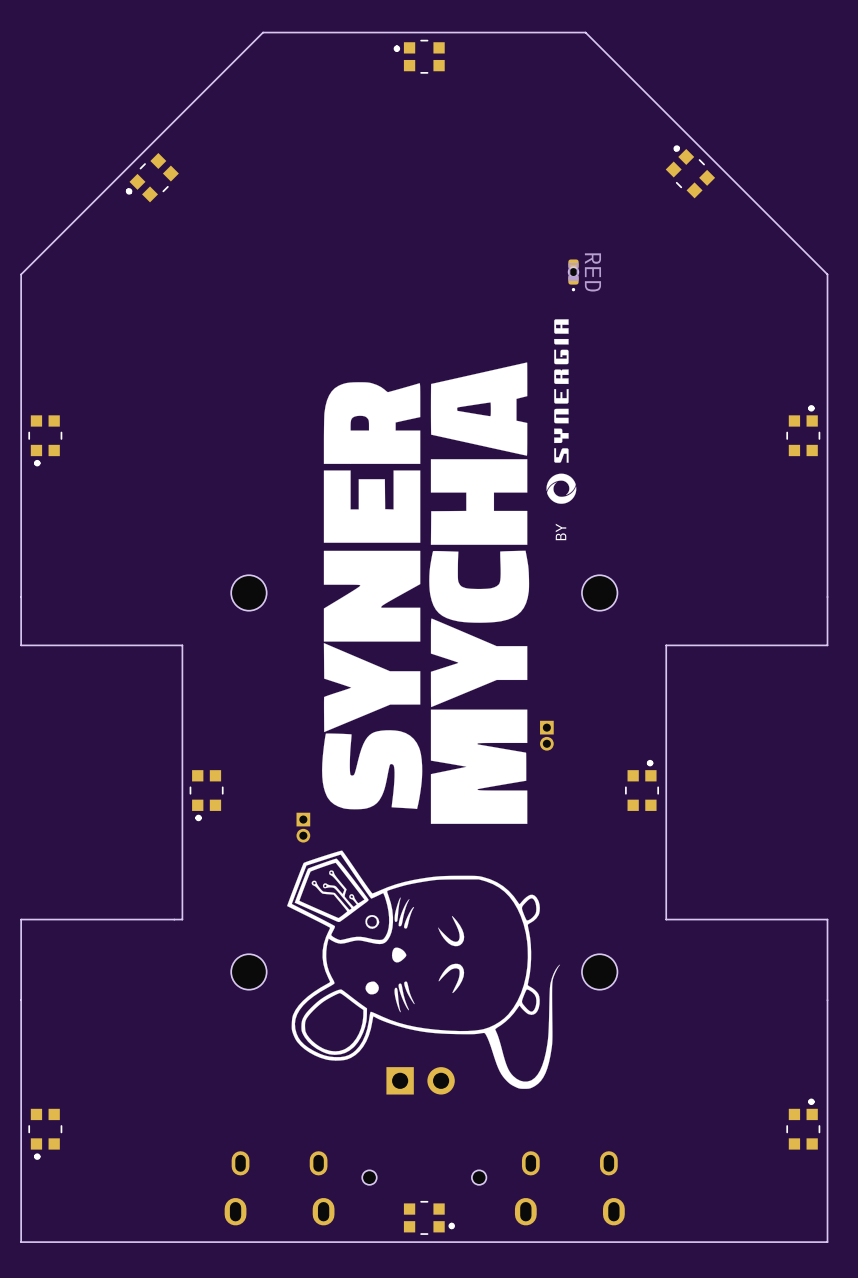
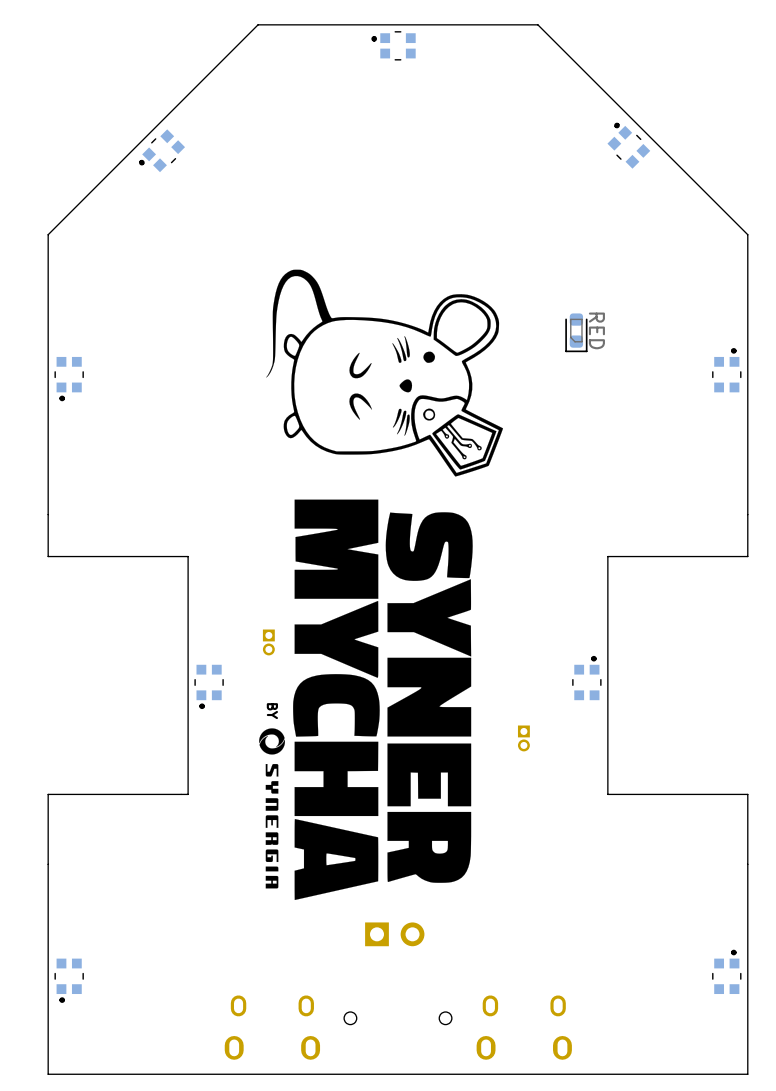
part: (573, 272) -> none
part: RED (573, 275) -> none
drawing: none -> [259, 269, 504, 901]
drawing: [287, 319, 577, 1089] -> none
part: none -> RED (576, 332)
text: BY (561, 531) -> none
part: (248, 592) -> none
part: (599, 592) -> none
part position: (546, 735) -> (523, 738)
text: none -> BY (272, 711)
part position: (303, 827) -> (268, 642)
part: (248, 971) -> none
part: (599, 971) -> none
part: (429, 1217) -> none

